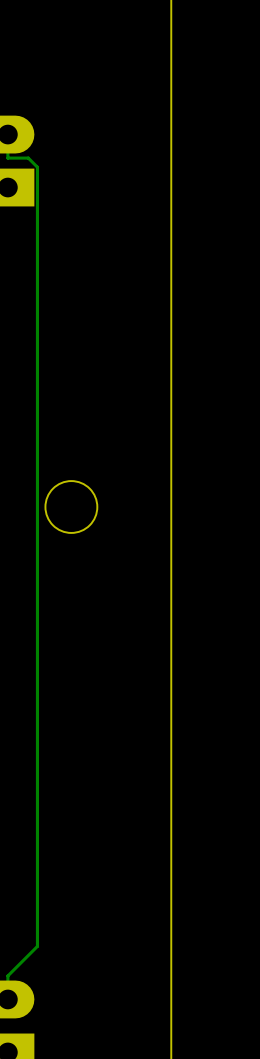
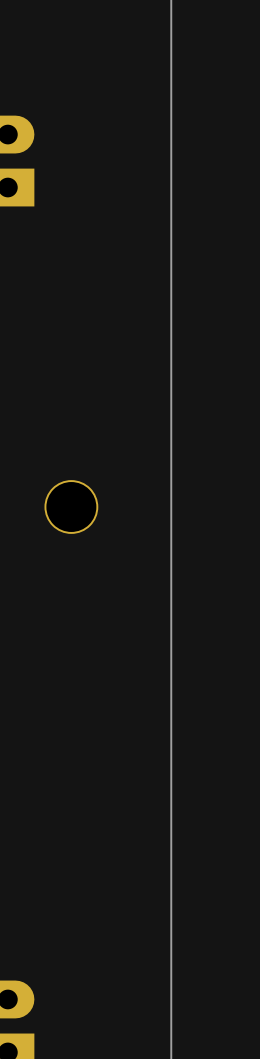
track: (7, 134) (7, 158) (28, 158) (37, 167) (37, 946) (7, 975) (7, 999) -> none

